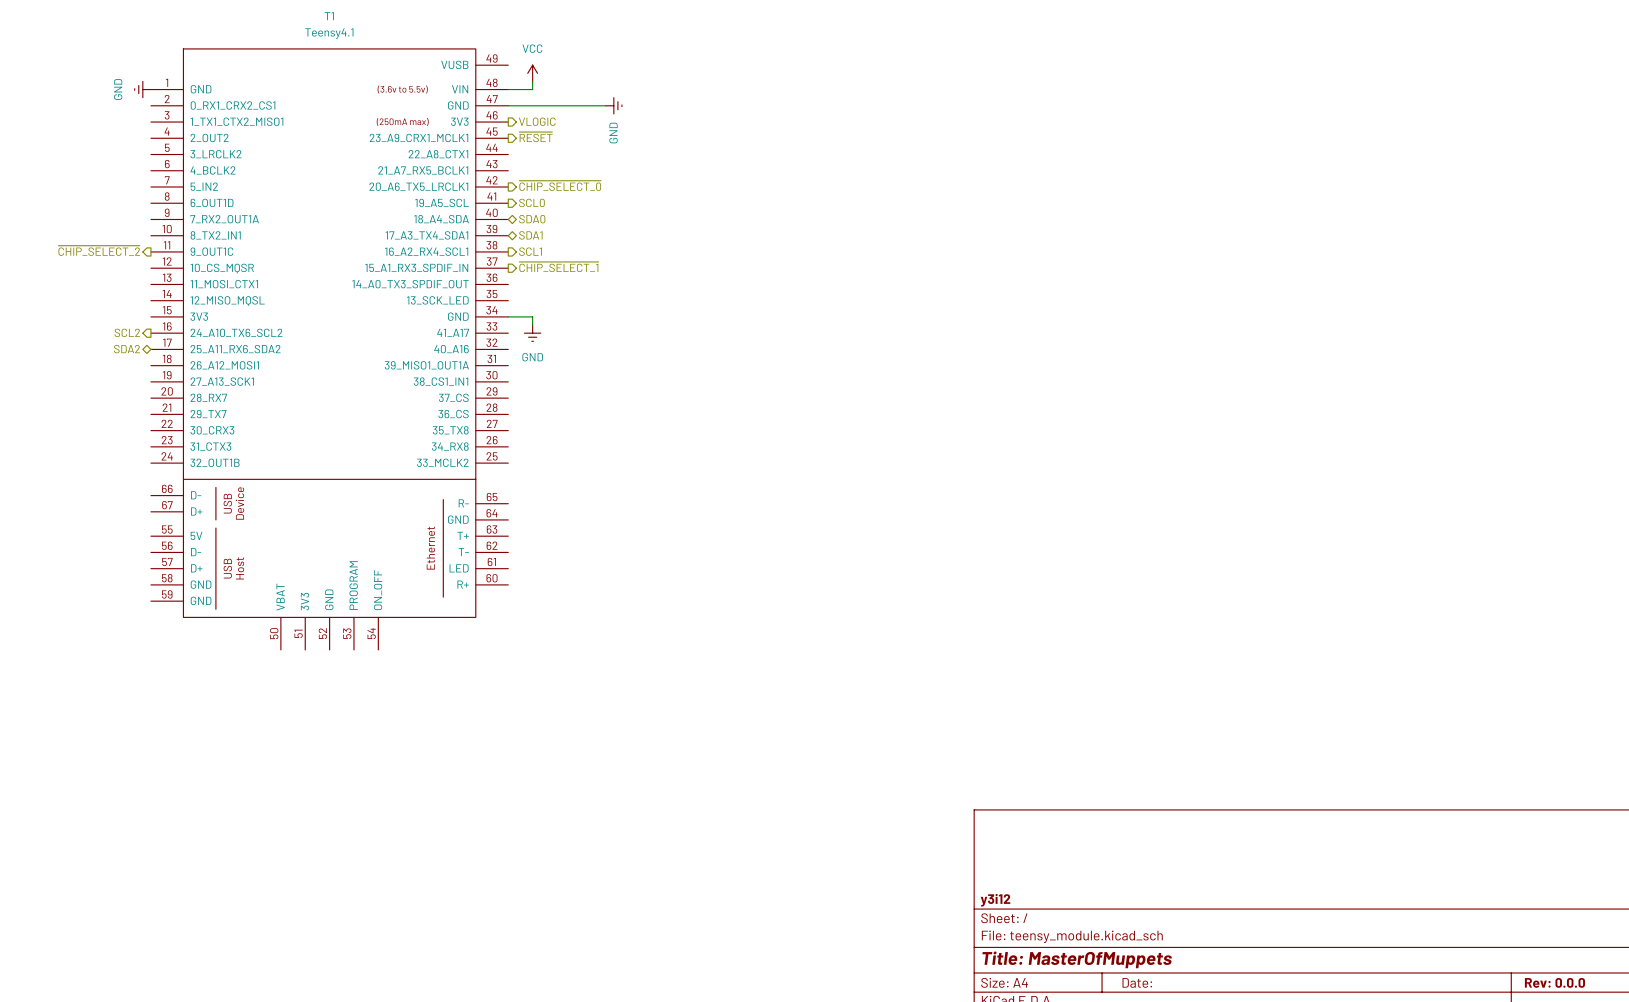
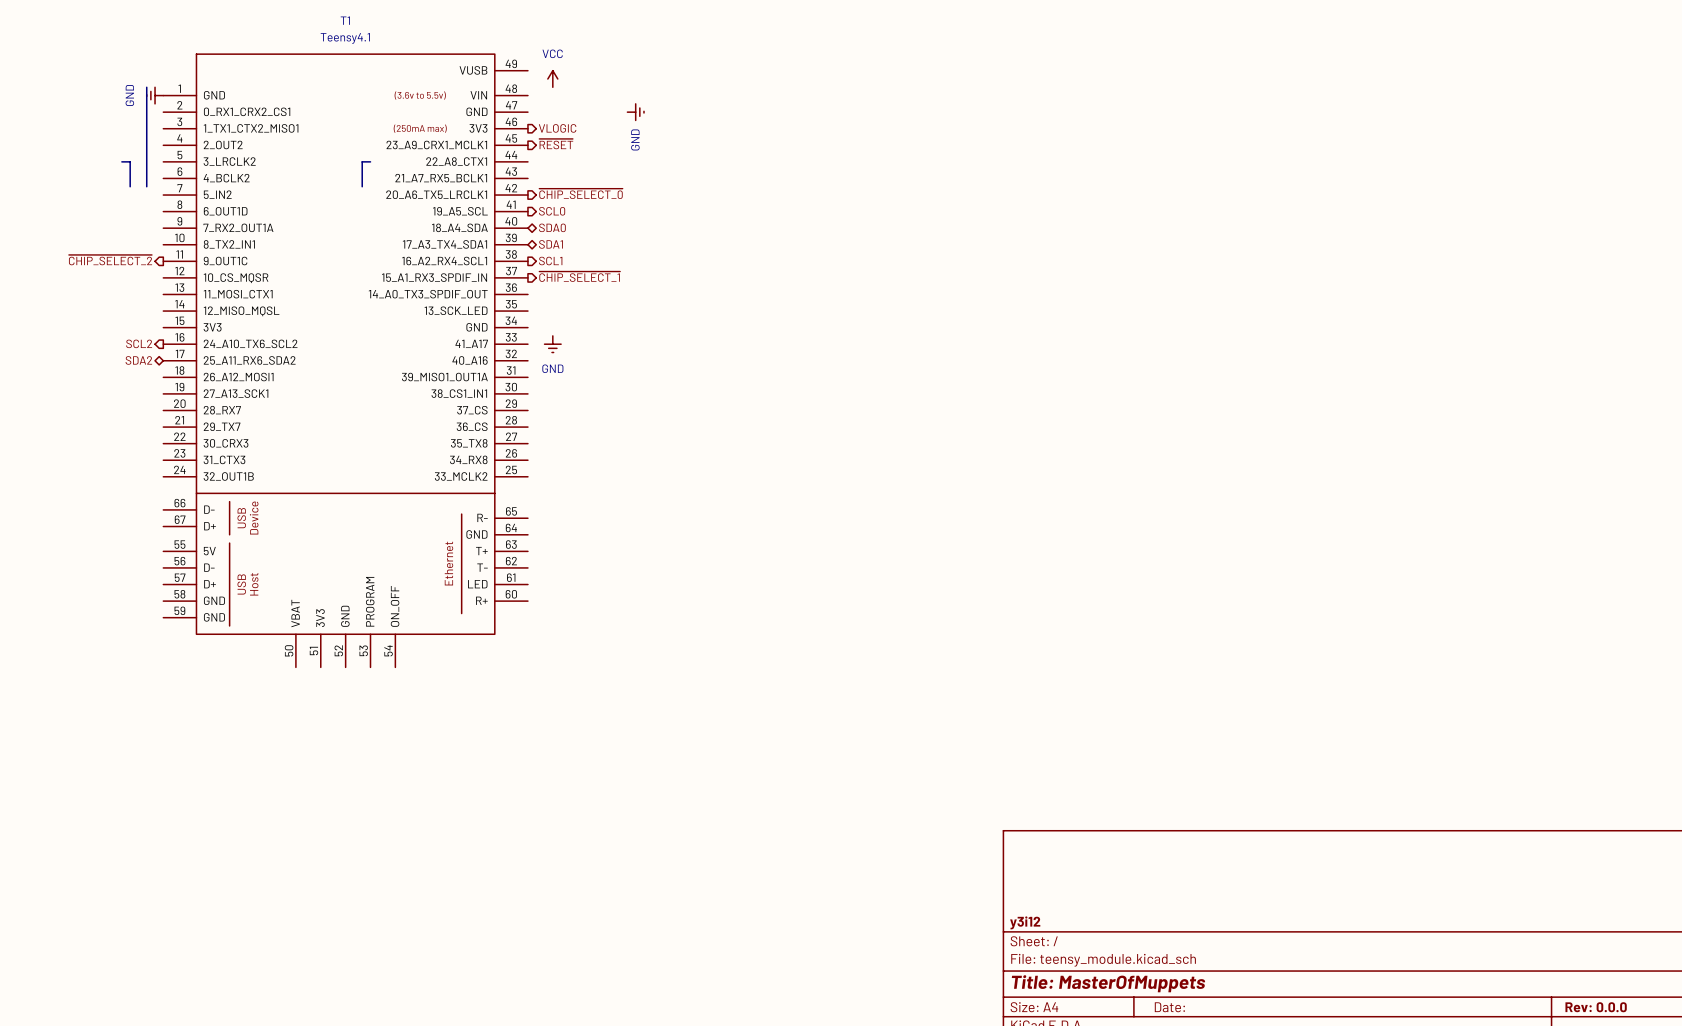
wire: none -> (146, 87) (146, 186)
wire: (532, 81) (532, 89) (508, 89) -> none
wire: (508, 105) (605, 105) -> none
wire: none -> (121, 161) (130, 161) (130, 186)
wire: none -> (370, 161) (362, 161) (362, 186)
wire: (508, 316) (532, 316) (532, 325) -> none

